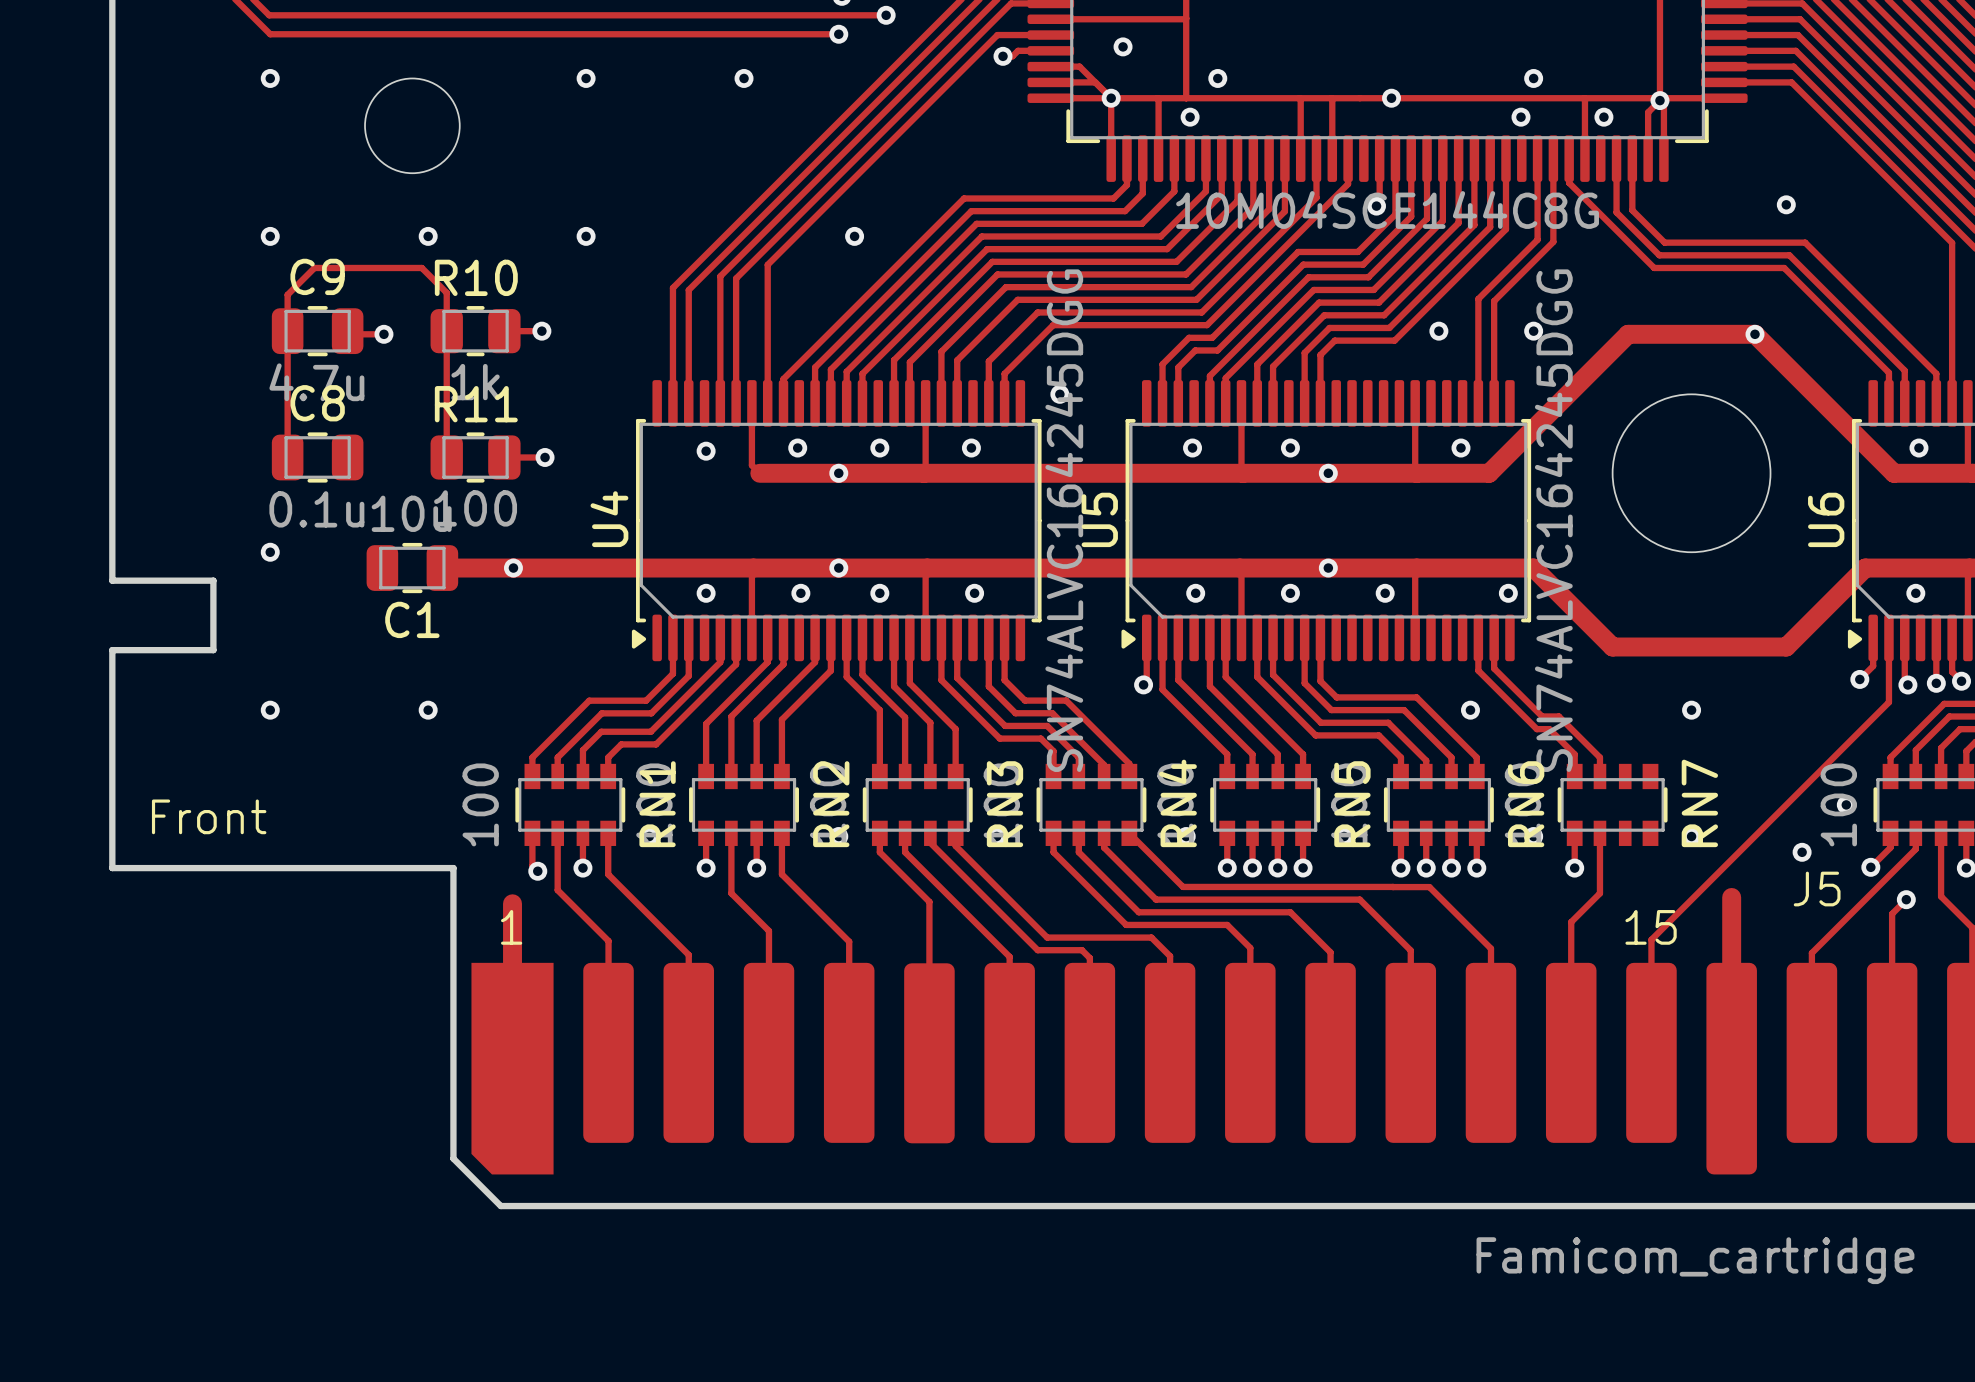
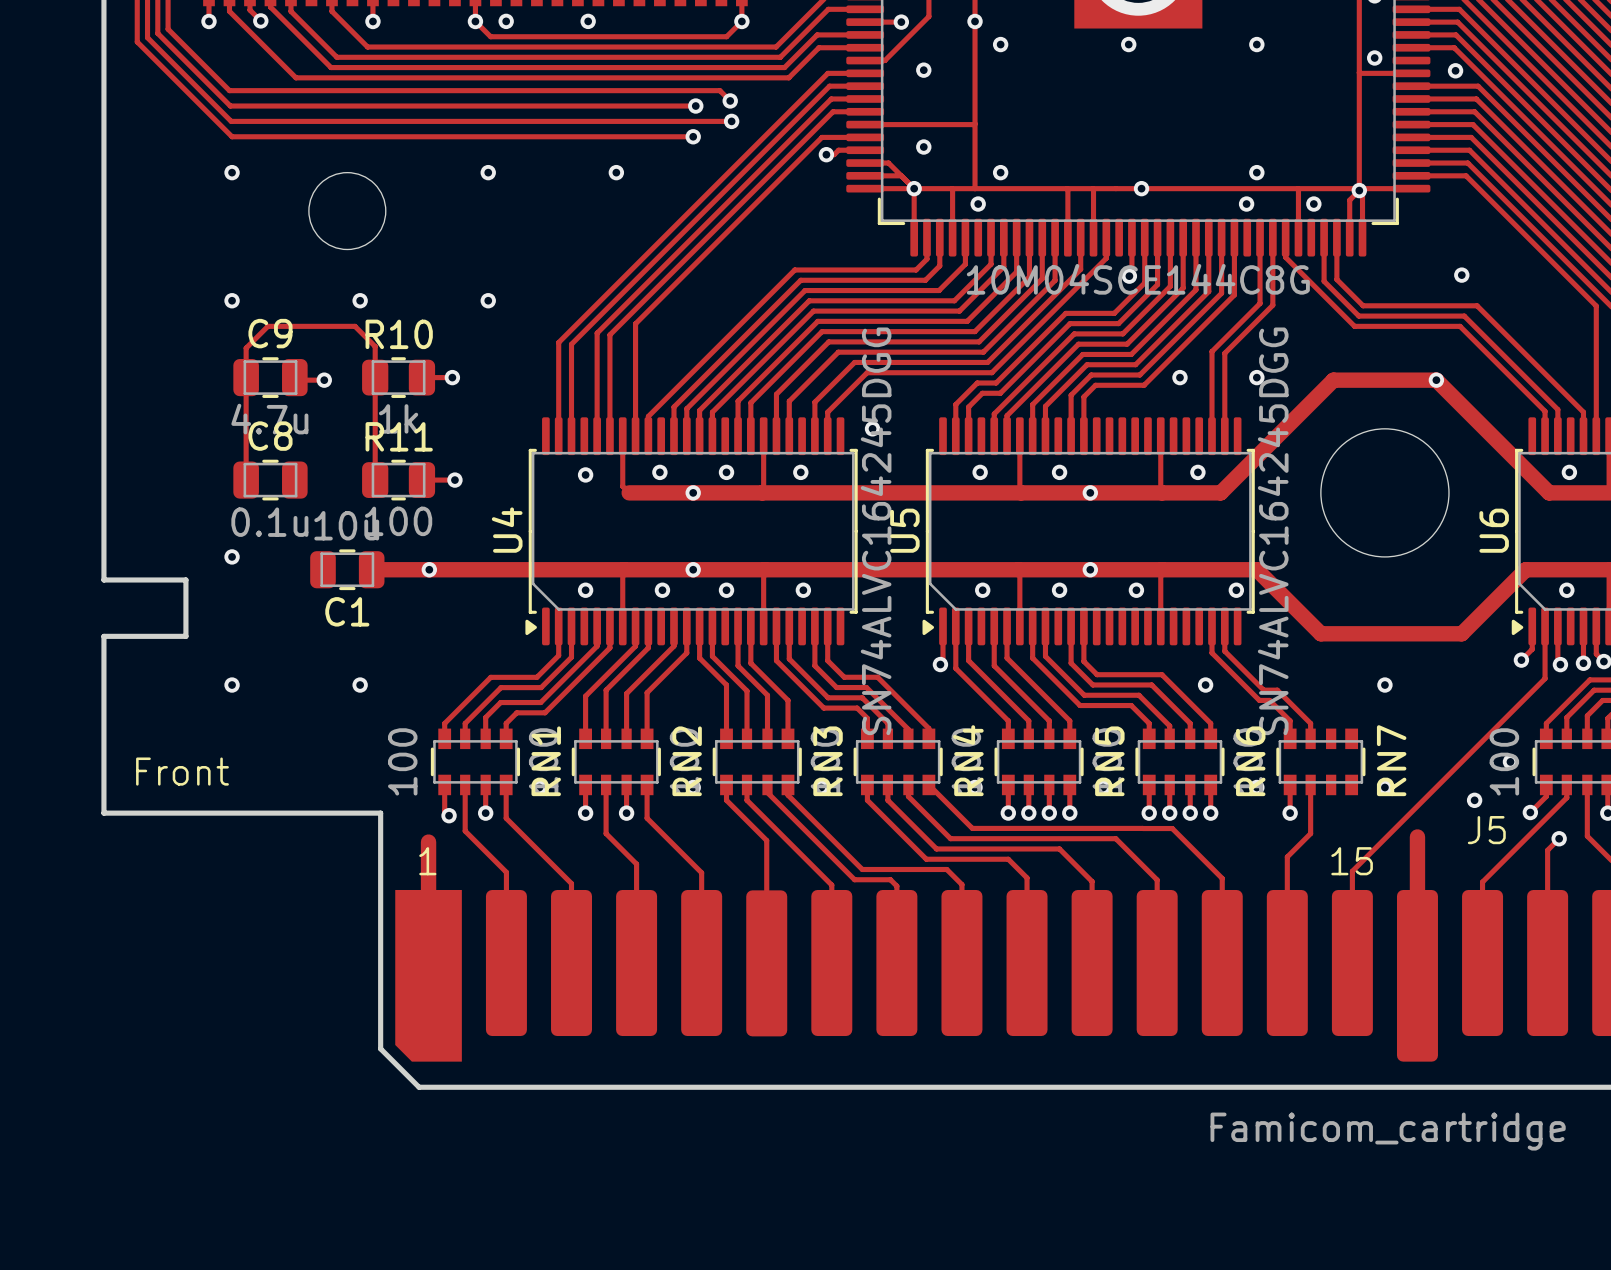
via: (854, 236) -> none

